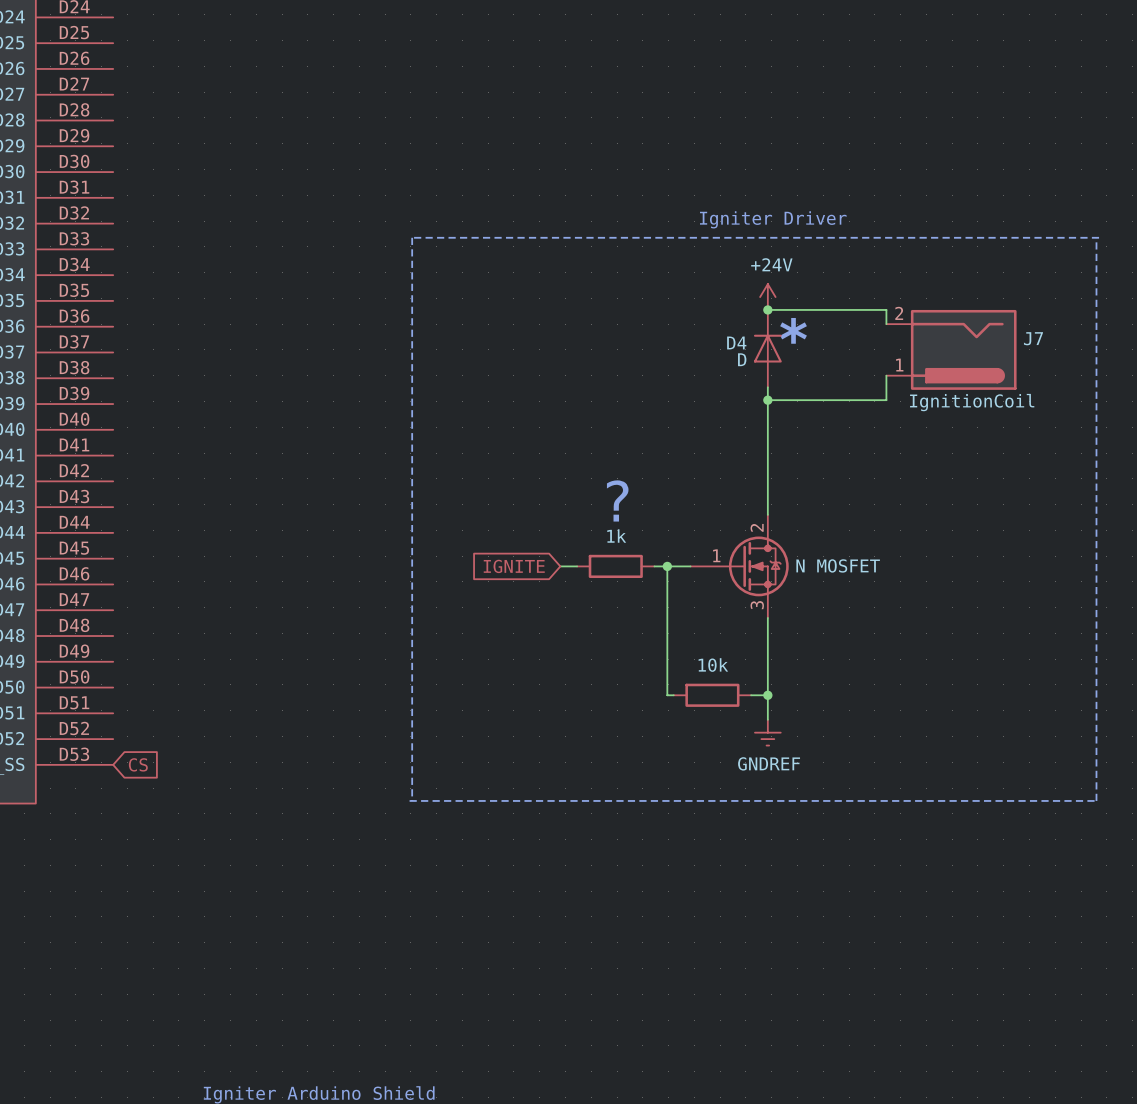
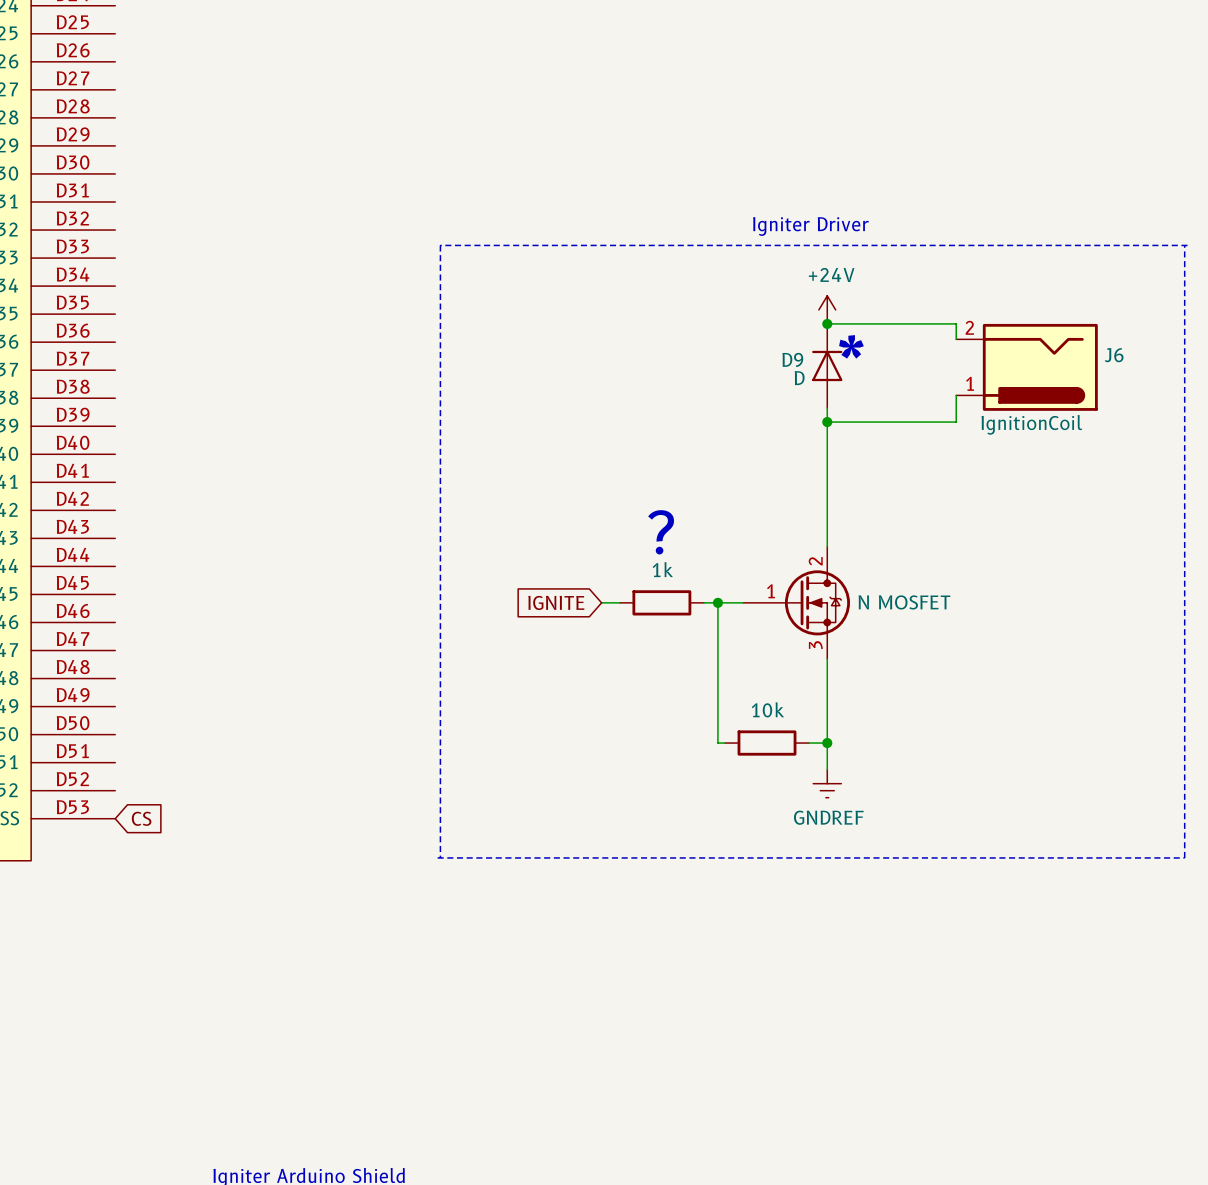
J7 name: J7 (1033, 338) -> J6 (1114, 355)
D4 name: D4 (736, 342) -> D9 (792, 359)

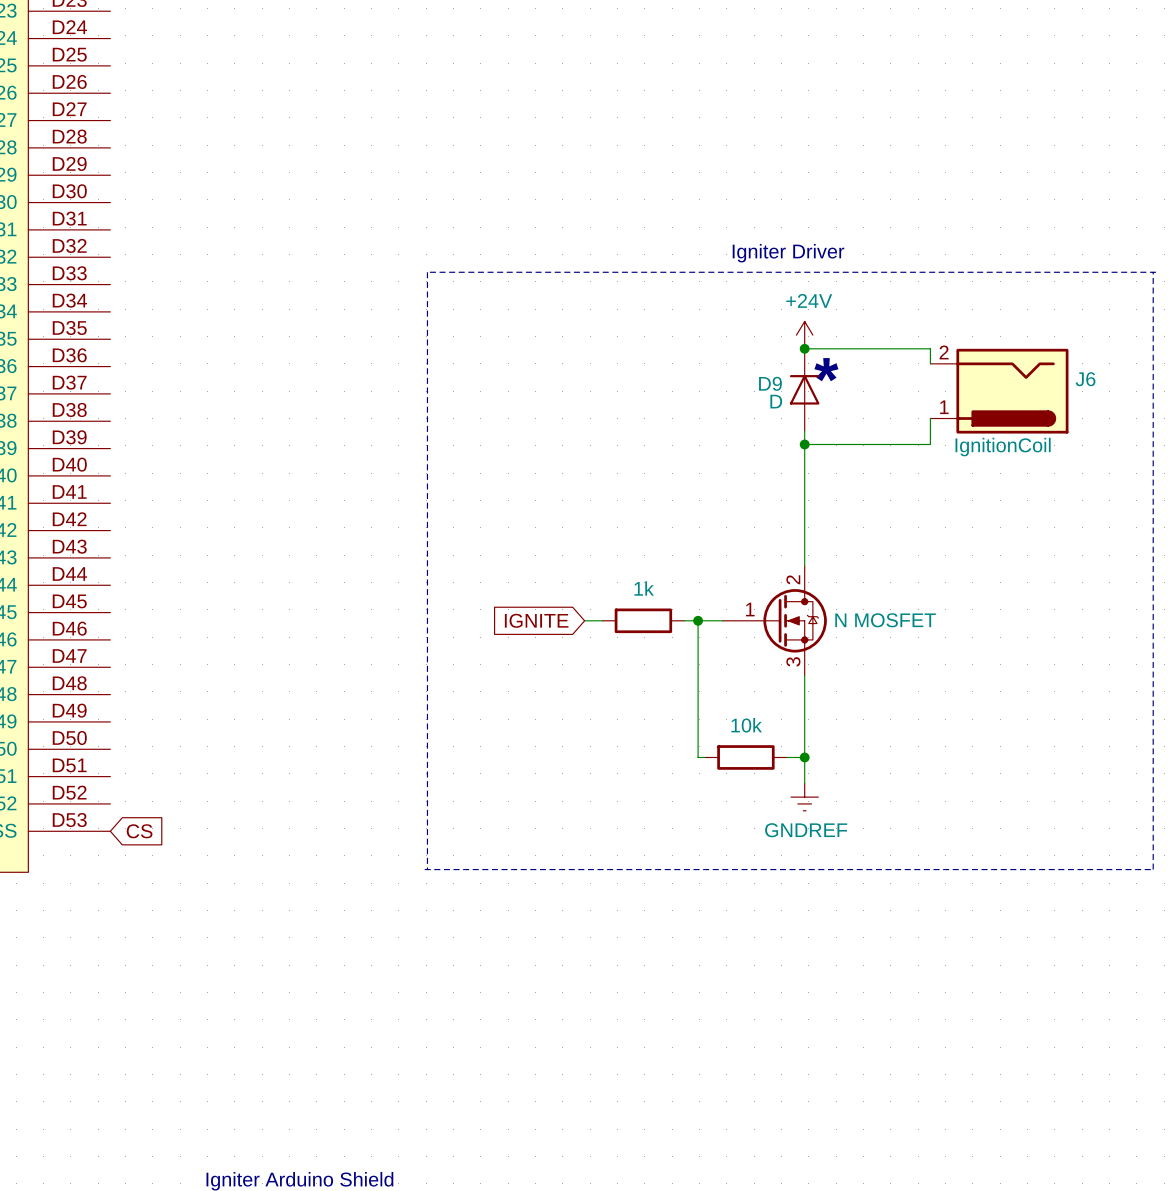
text: ? (661, 532) -> none

